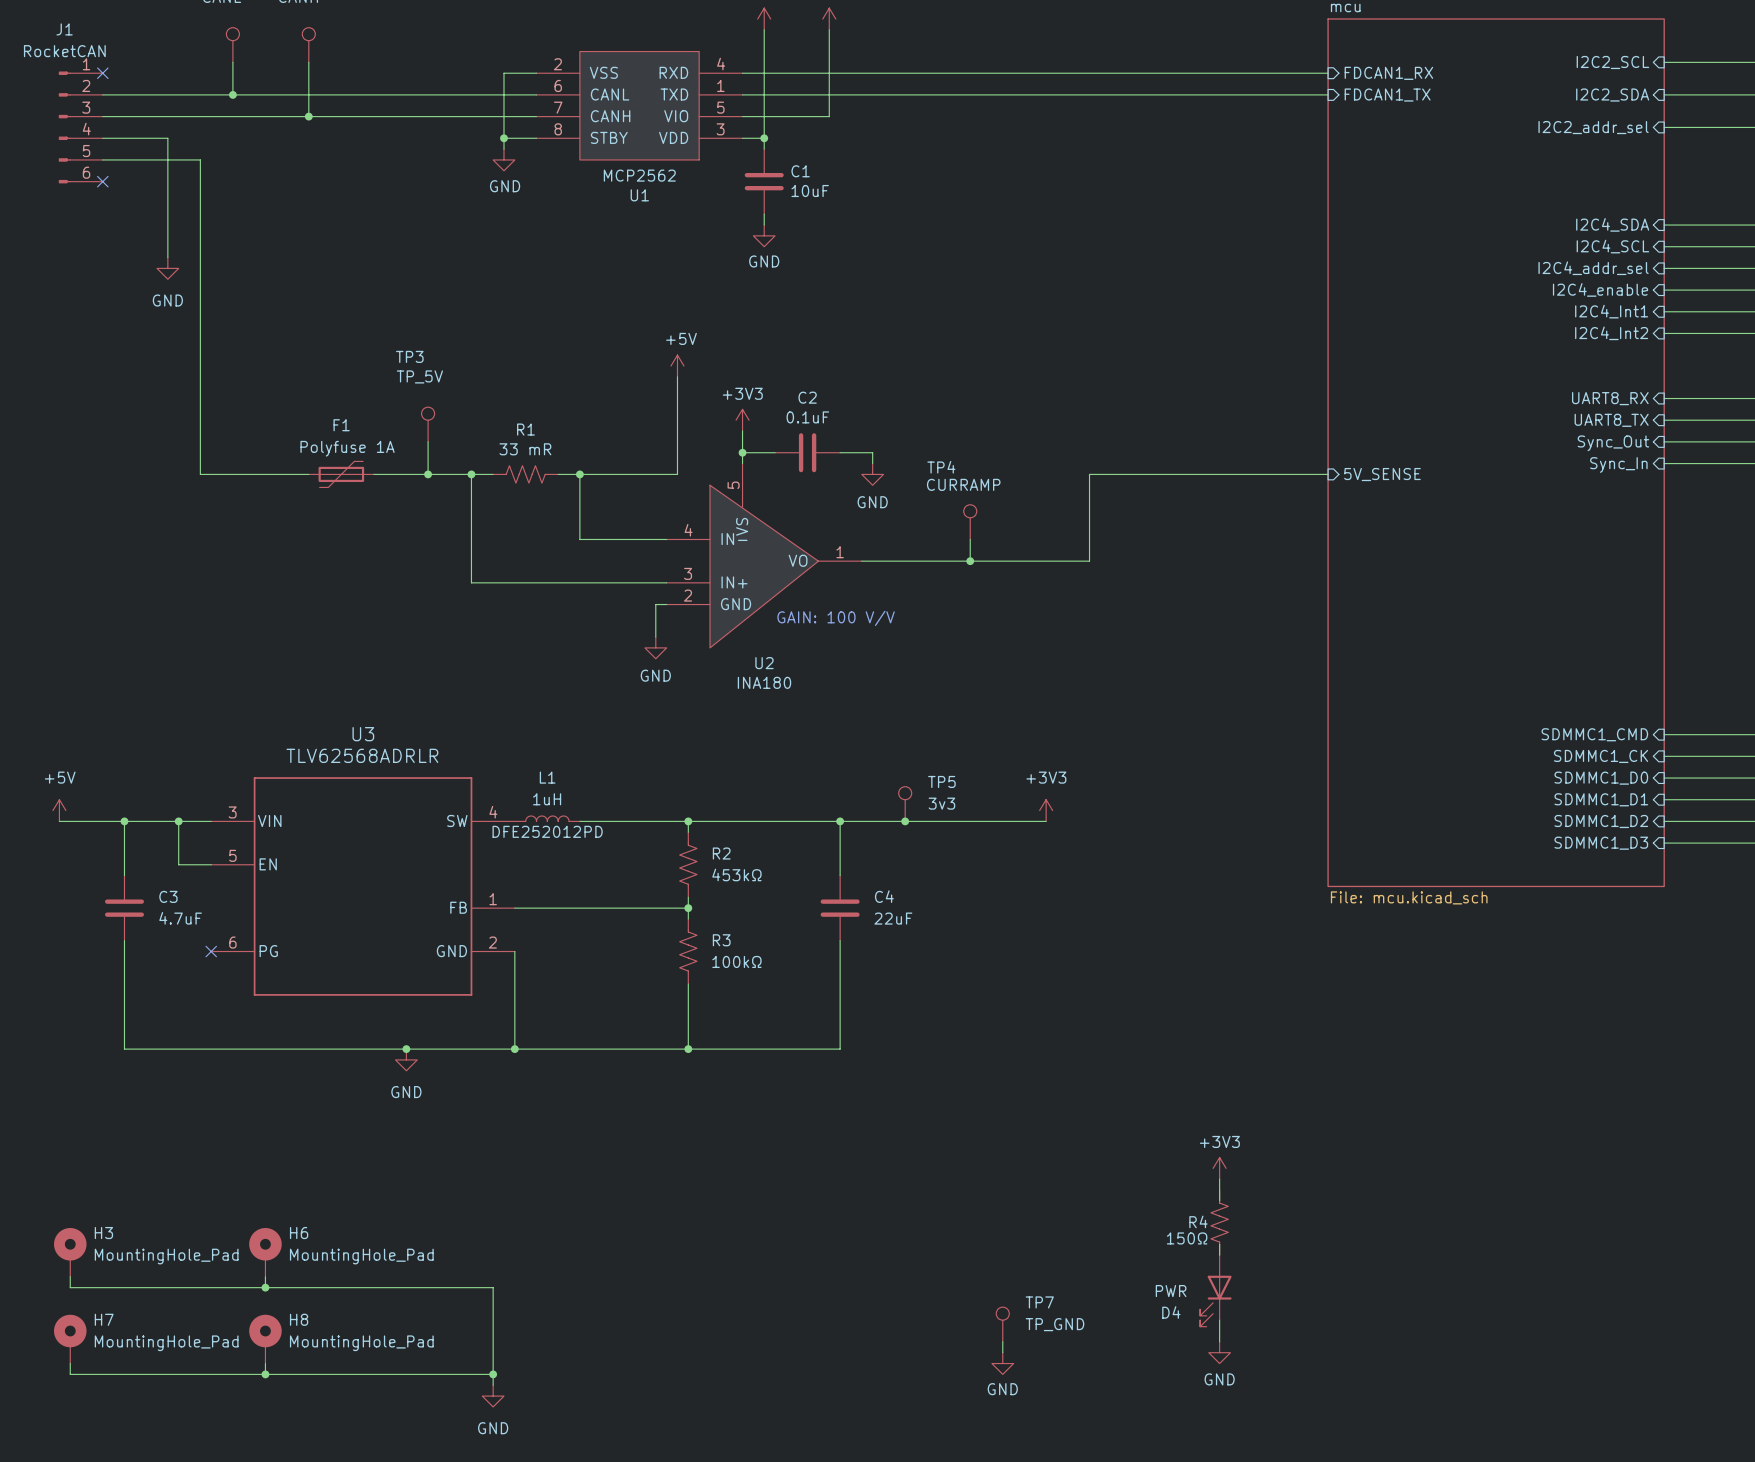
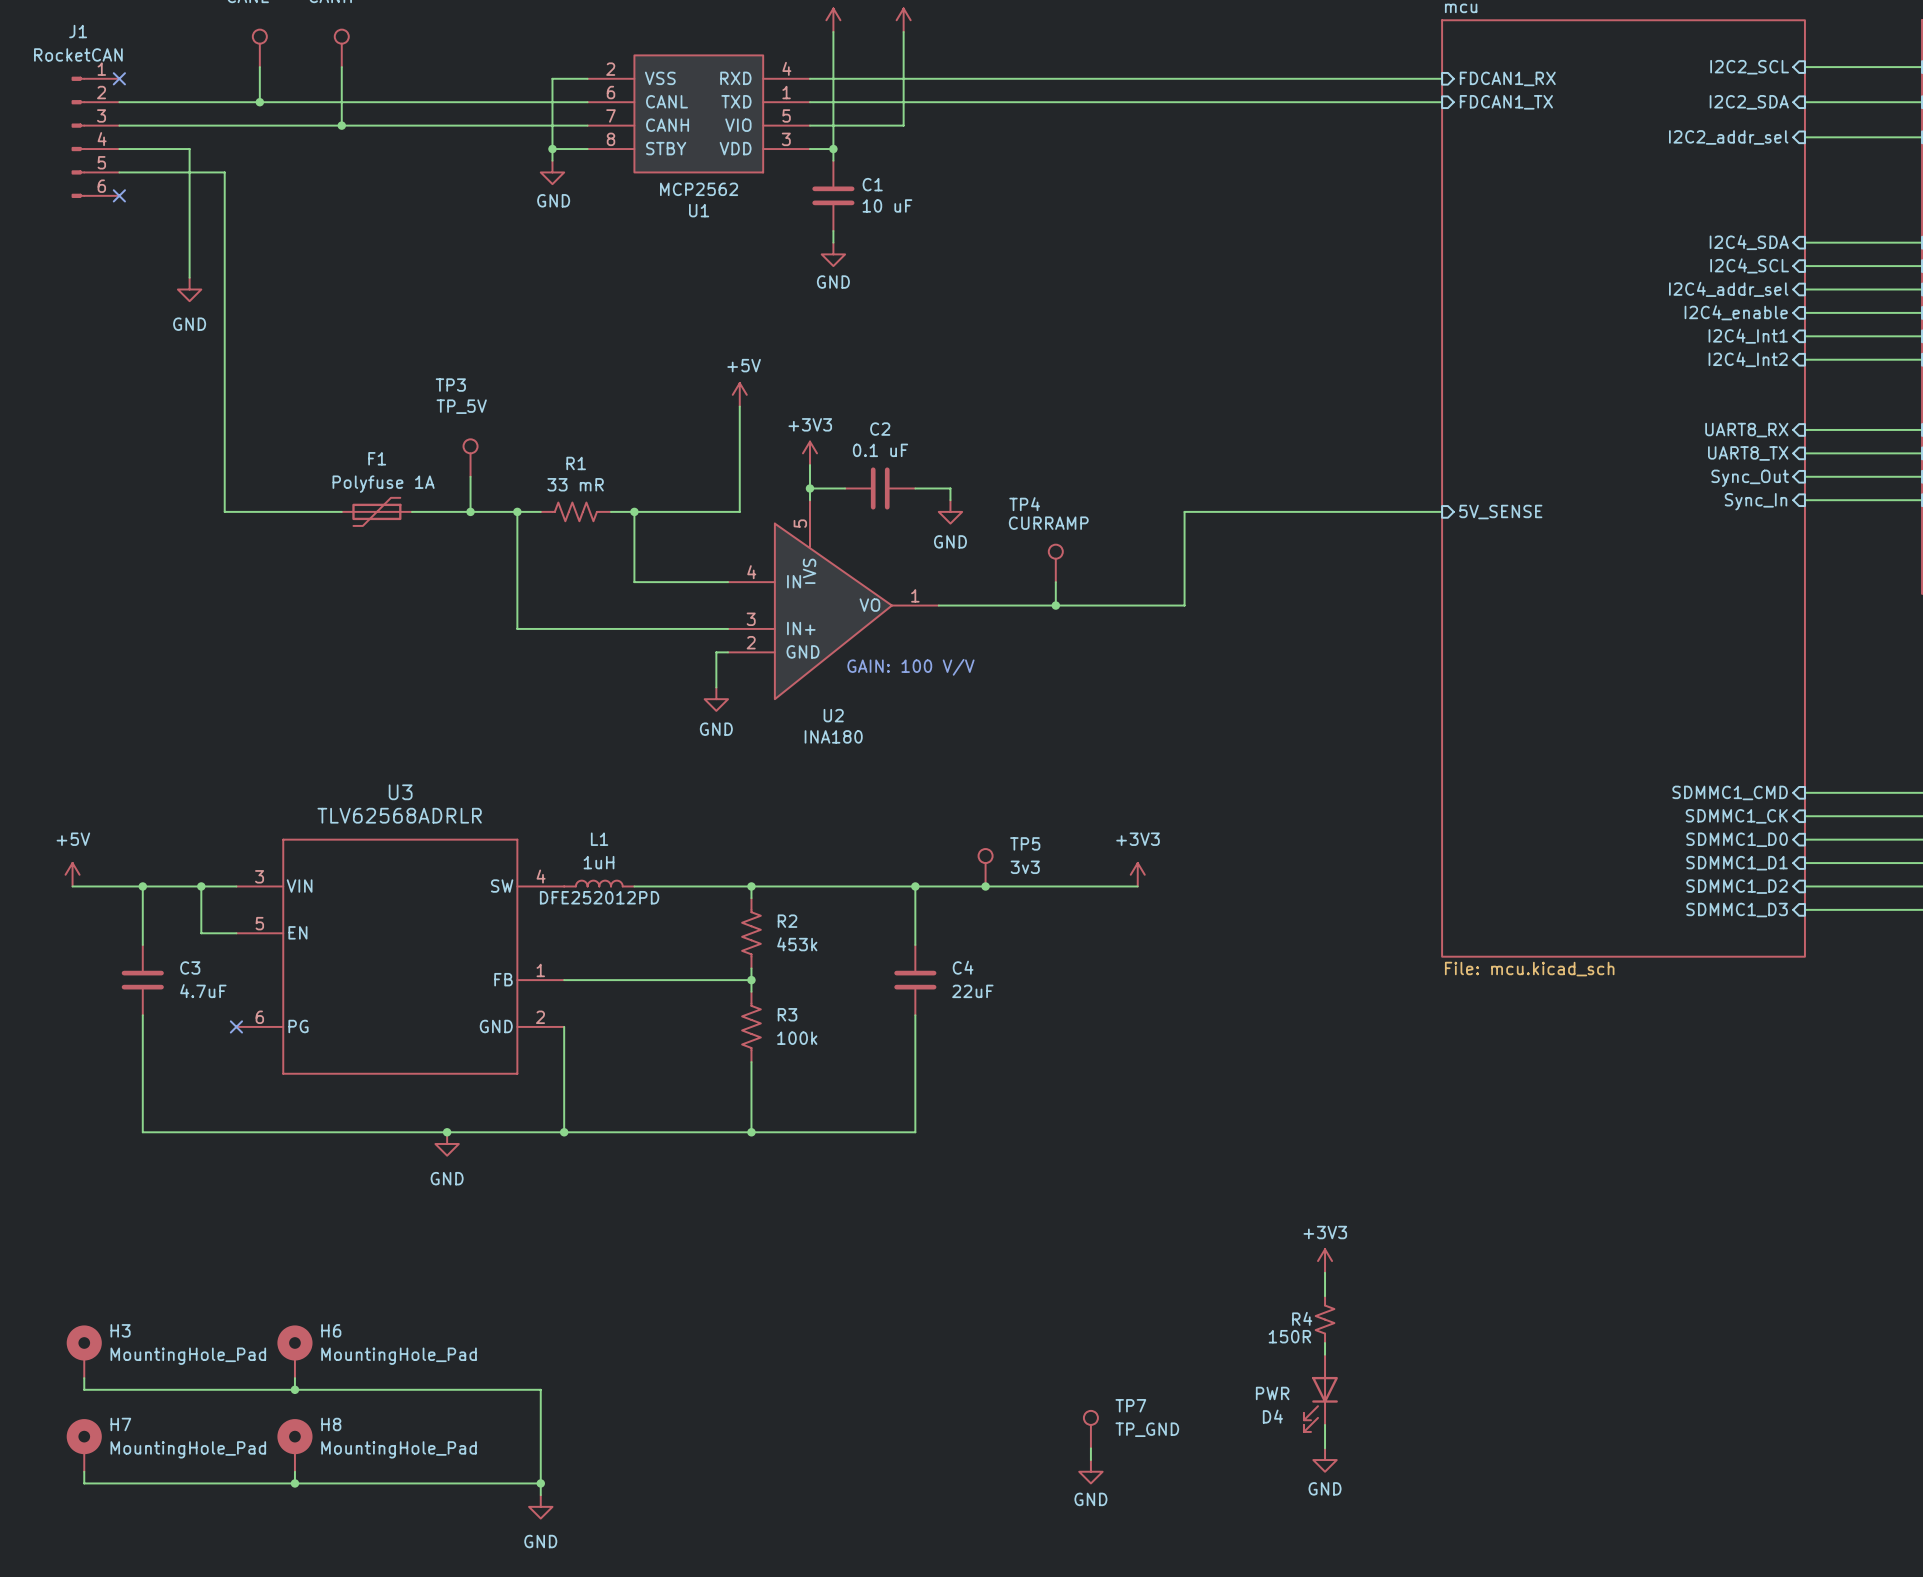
C1 value: 10uF (810, 191) -> 10 uF (887, 205)
C2 value: 0.1uF (807, 417) -> 0.1 uF (880, 450)
R2 value: 453kΩ (736, 874) -> 453k (797, 944)
R3 value: 100kΩ (736, 961) -> 100k (797, 1038)
R4 symbol: [1210, 1190, 1229, 1256] -> [1315, 1296, 1335, 1343]
R4 value: 150Ω (1187, 1238) -> 150R (1289, 1336)

